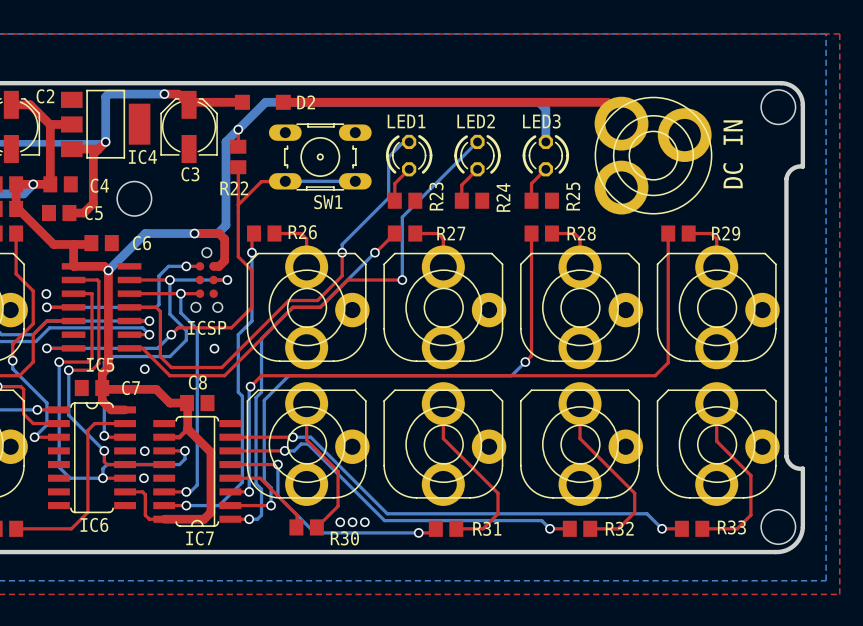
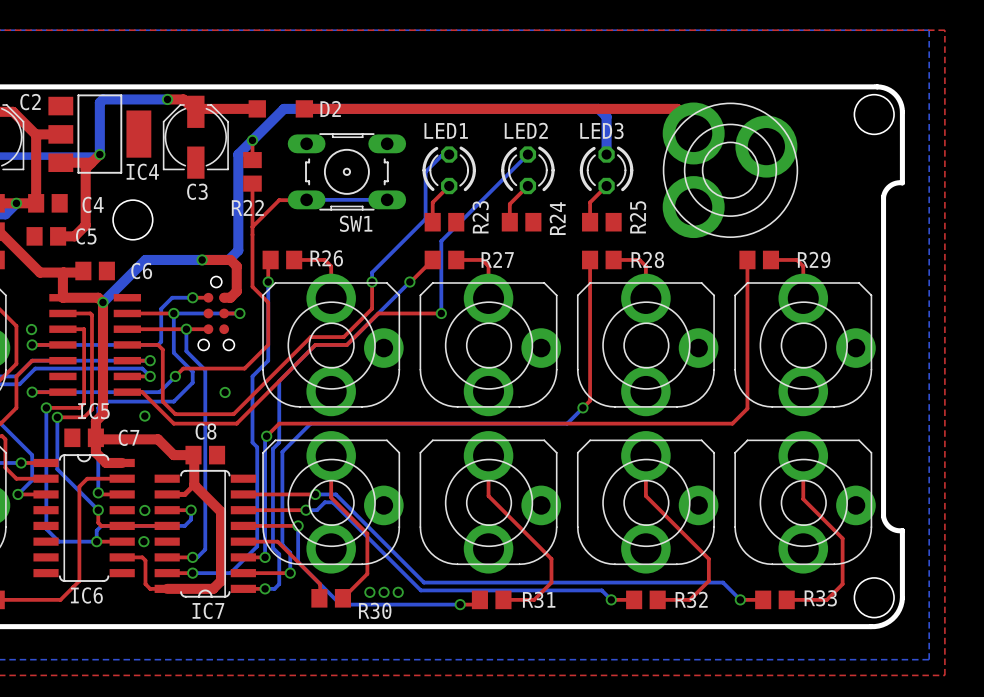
text: DC IN (733, 154) -> none
ICSP name: ICSP (207, 327) -> none

